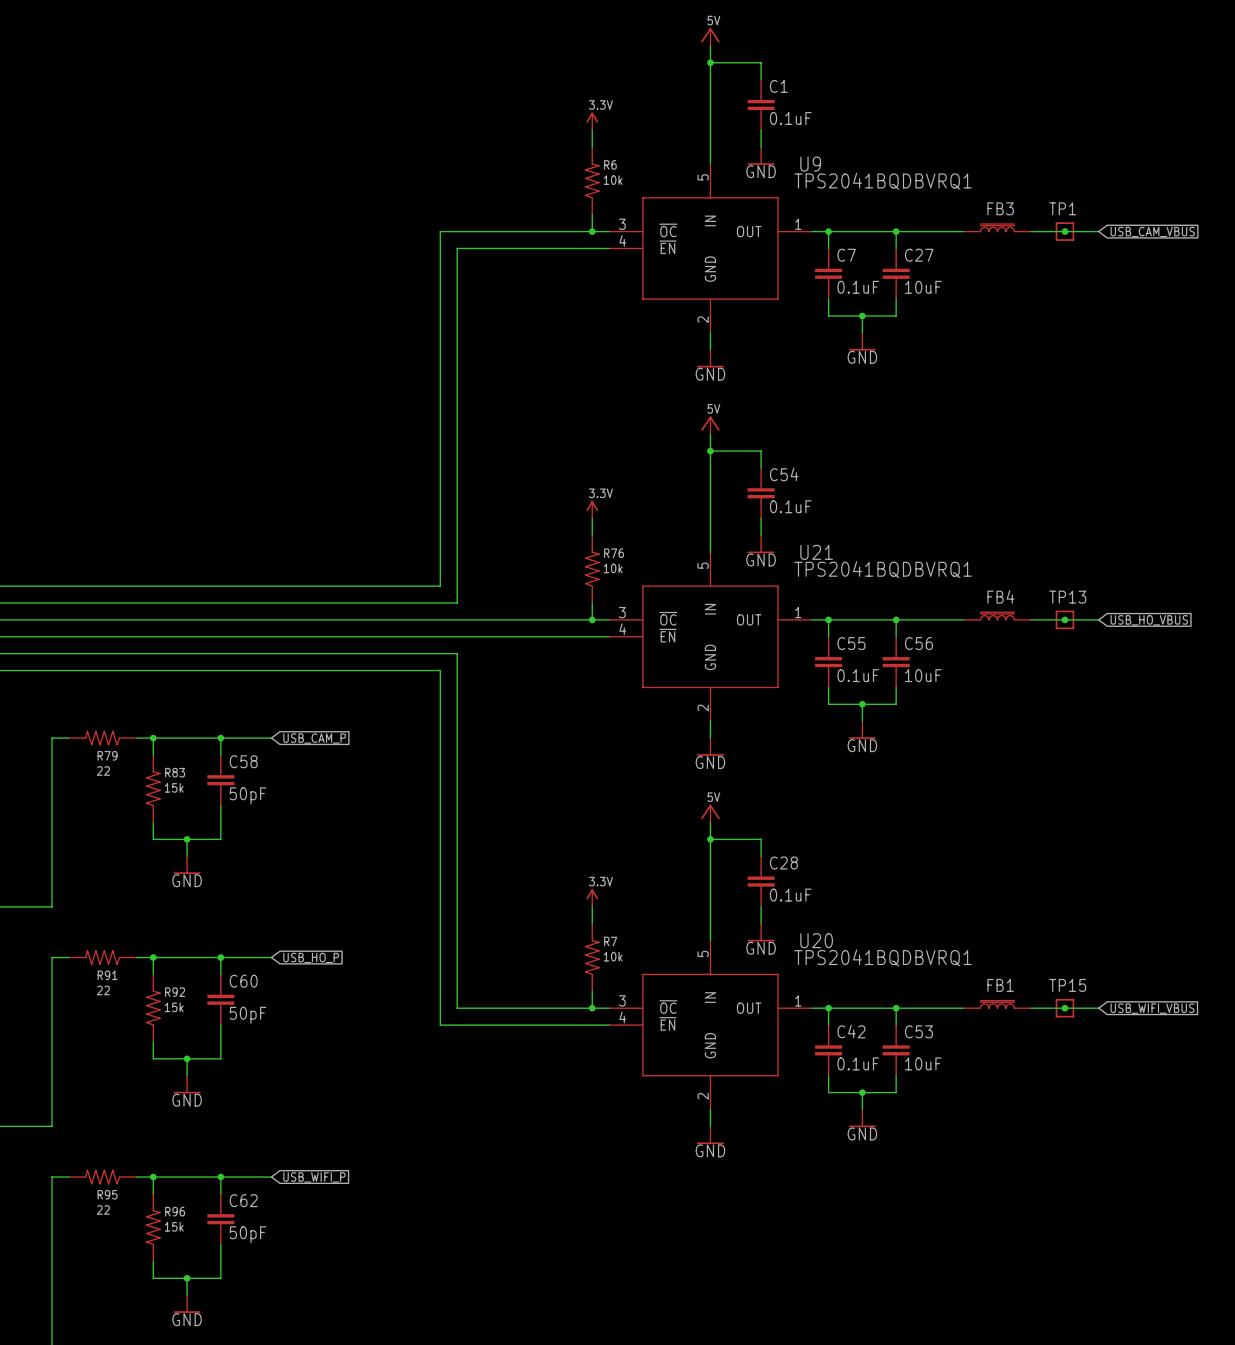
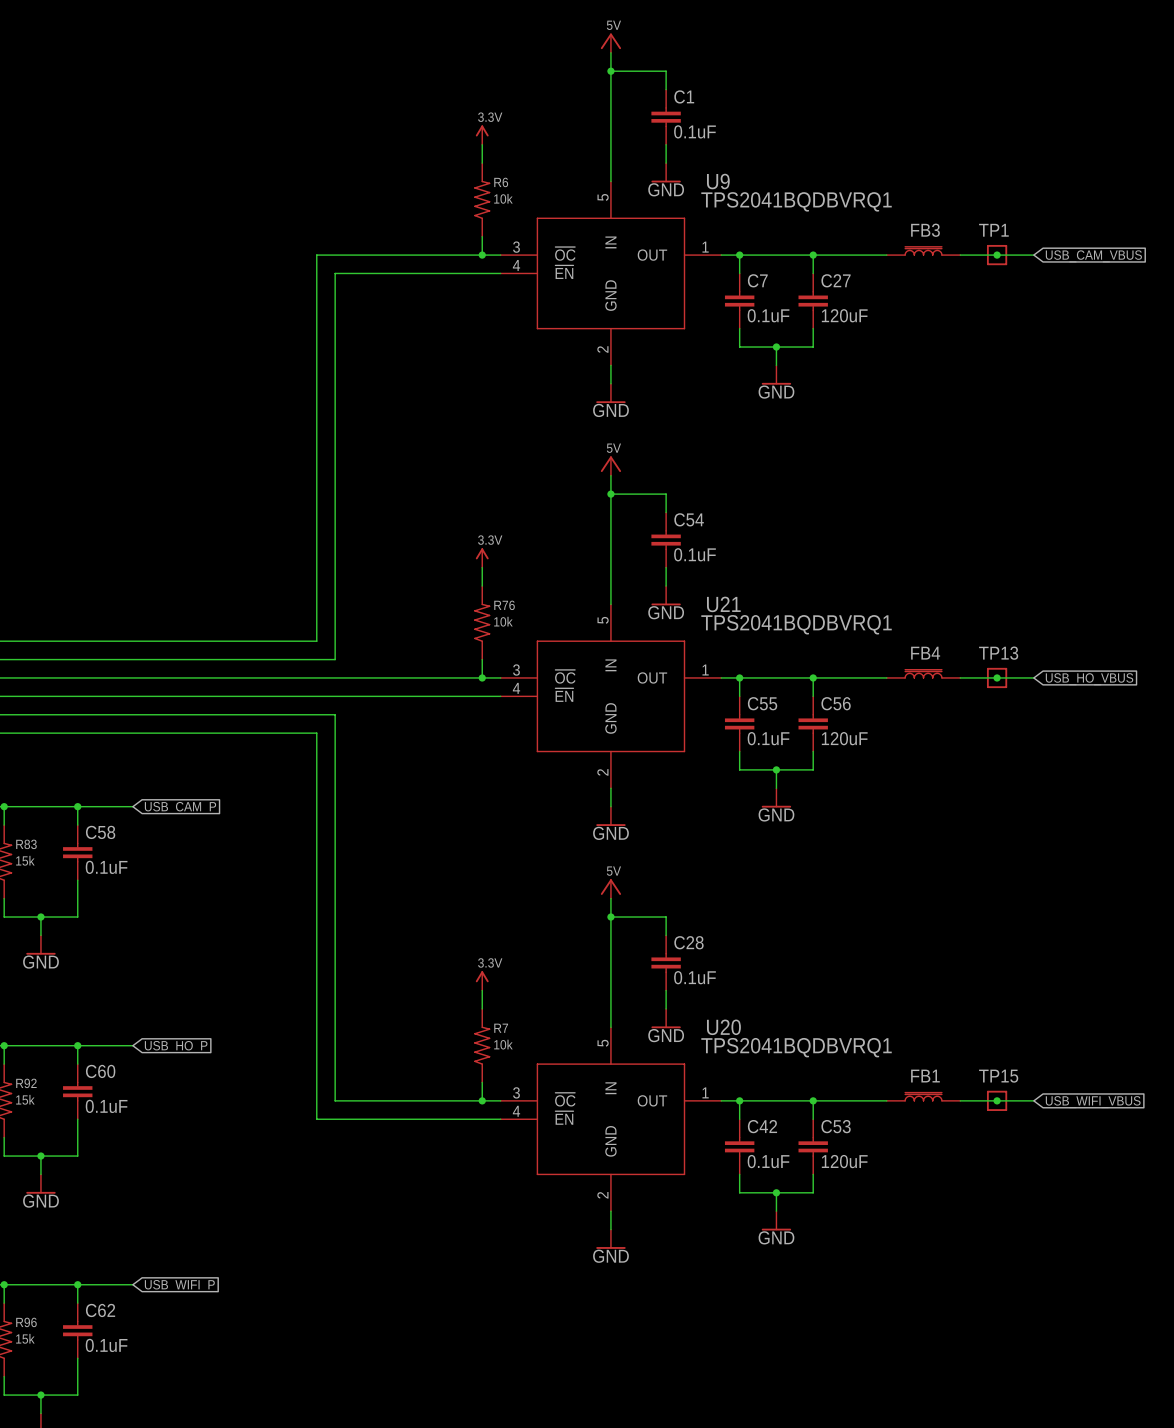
C27 value: 10uF (923, 287) -> 120uF (844, 315)
C56 value: 10uF (923, 675) -> 120uF (844, 738)
C58 value: 50pF (247, 795) -> 0.1uF (106, 867)
C60 value: 50pF (247, 1015) -> 0.1uF (106, 1106)
C53 value: 10uF (923, 1063) -> 120uF (844, 1161)
C62 value: 50pF (247, 1234) -> 0.1uF (106, 1345)

